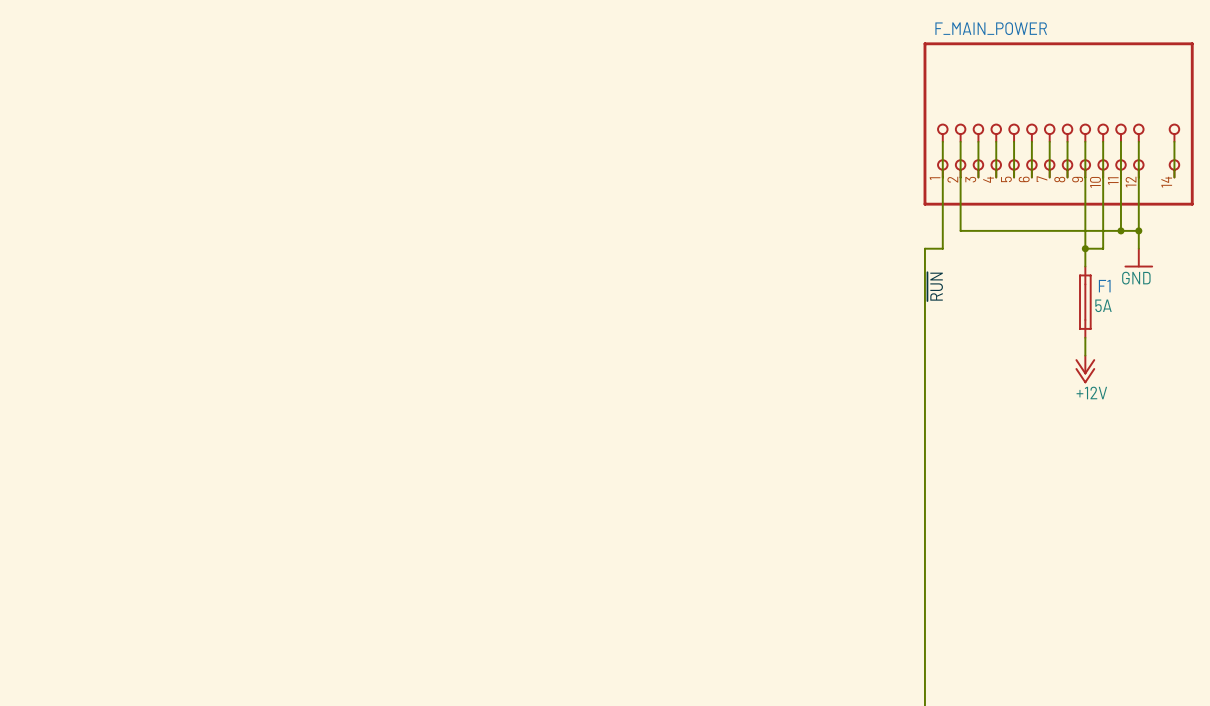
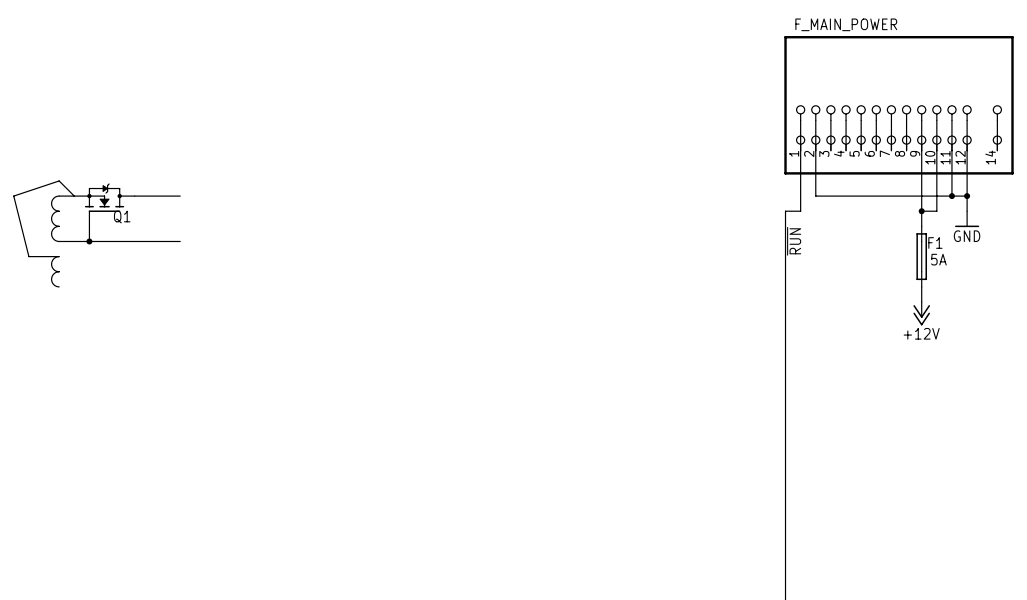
wire: none -> (59, 196) (74, 196) (59, 180) (13, 196) (28, 256) (59, 256)
line: none -> (59, 196) (53, 198) (51, 203) (53, 209) (59, 211) (54, 212) (51, 216) (53, 223) (59, 226) (53, 229) (51, 235) (54, 239) (59, 241)
wire: none -> (134, 196) (180, 196)
Q1: none -> (104, 204)
wire: none -> (89, 226) (89, 241)
wire: none -> (59, 241) (180, 241)
junction: none -> (89, 241)
line: none -> (59, 256) (53, 258) (51, 264) (53, 269) (59, 271) (53, 274) (51, 281) (54, 285) (59, 286)

